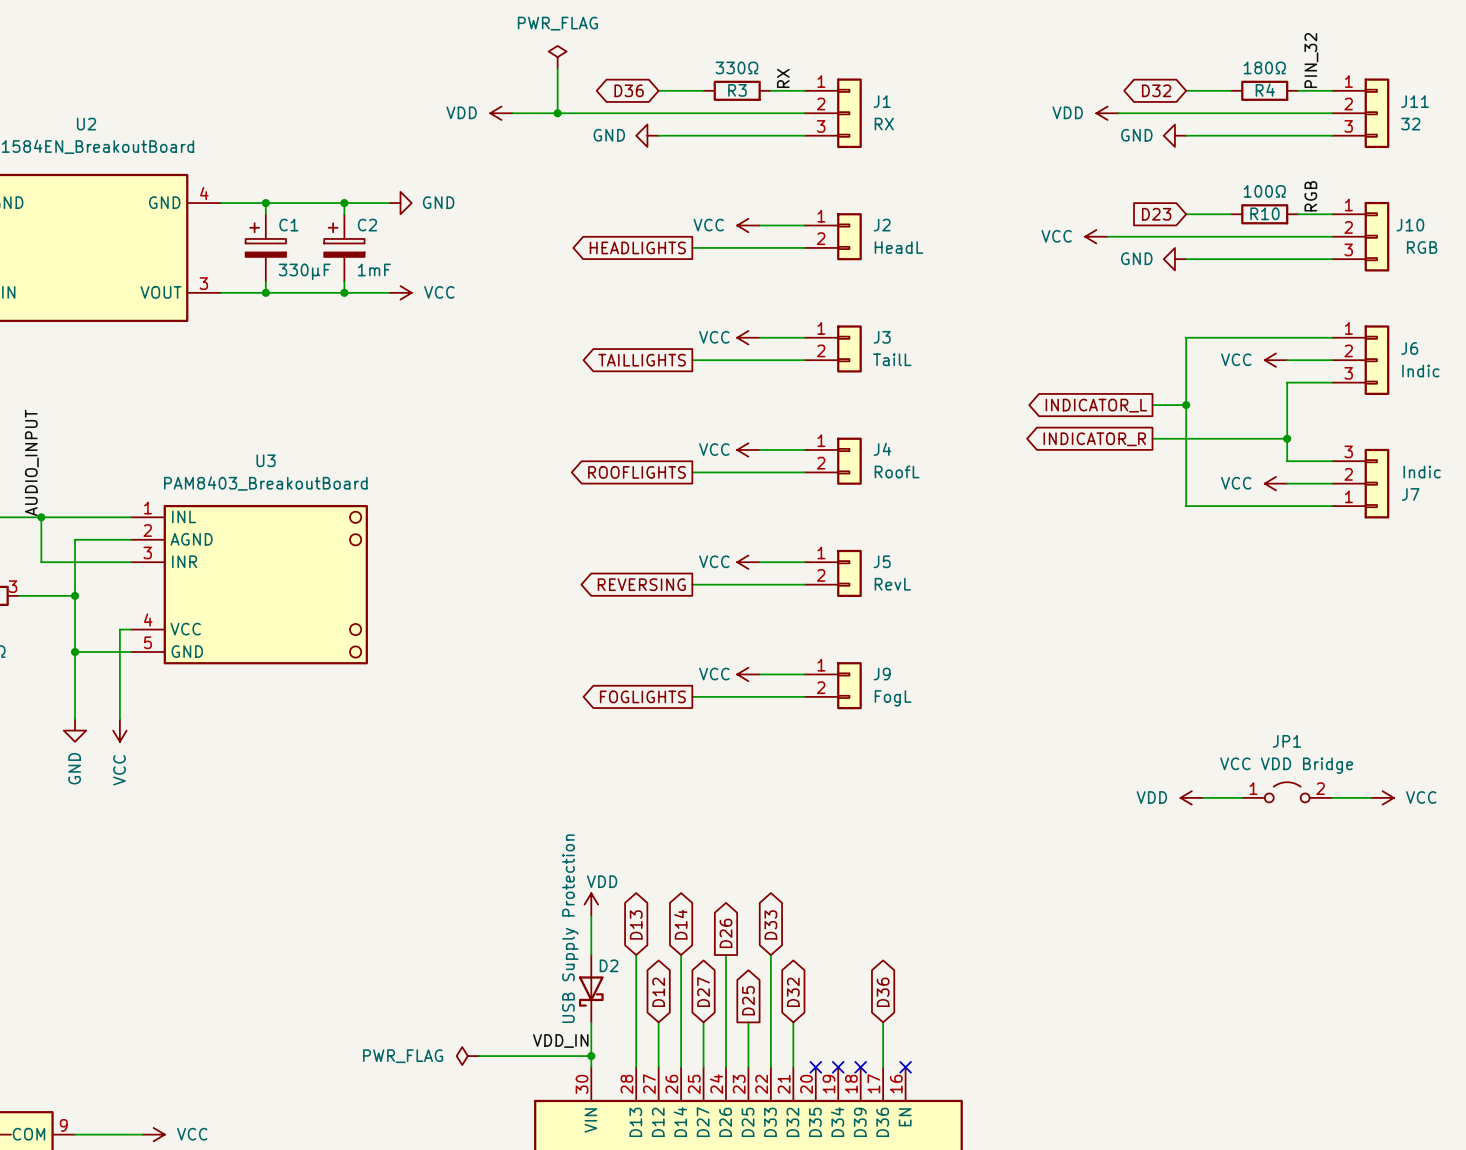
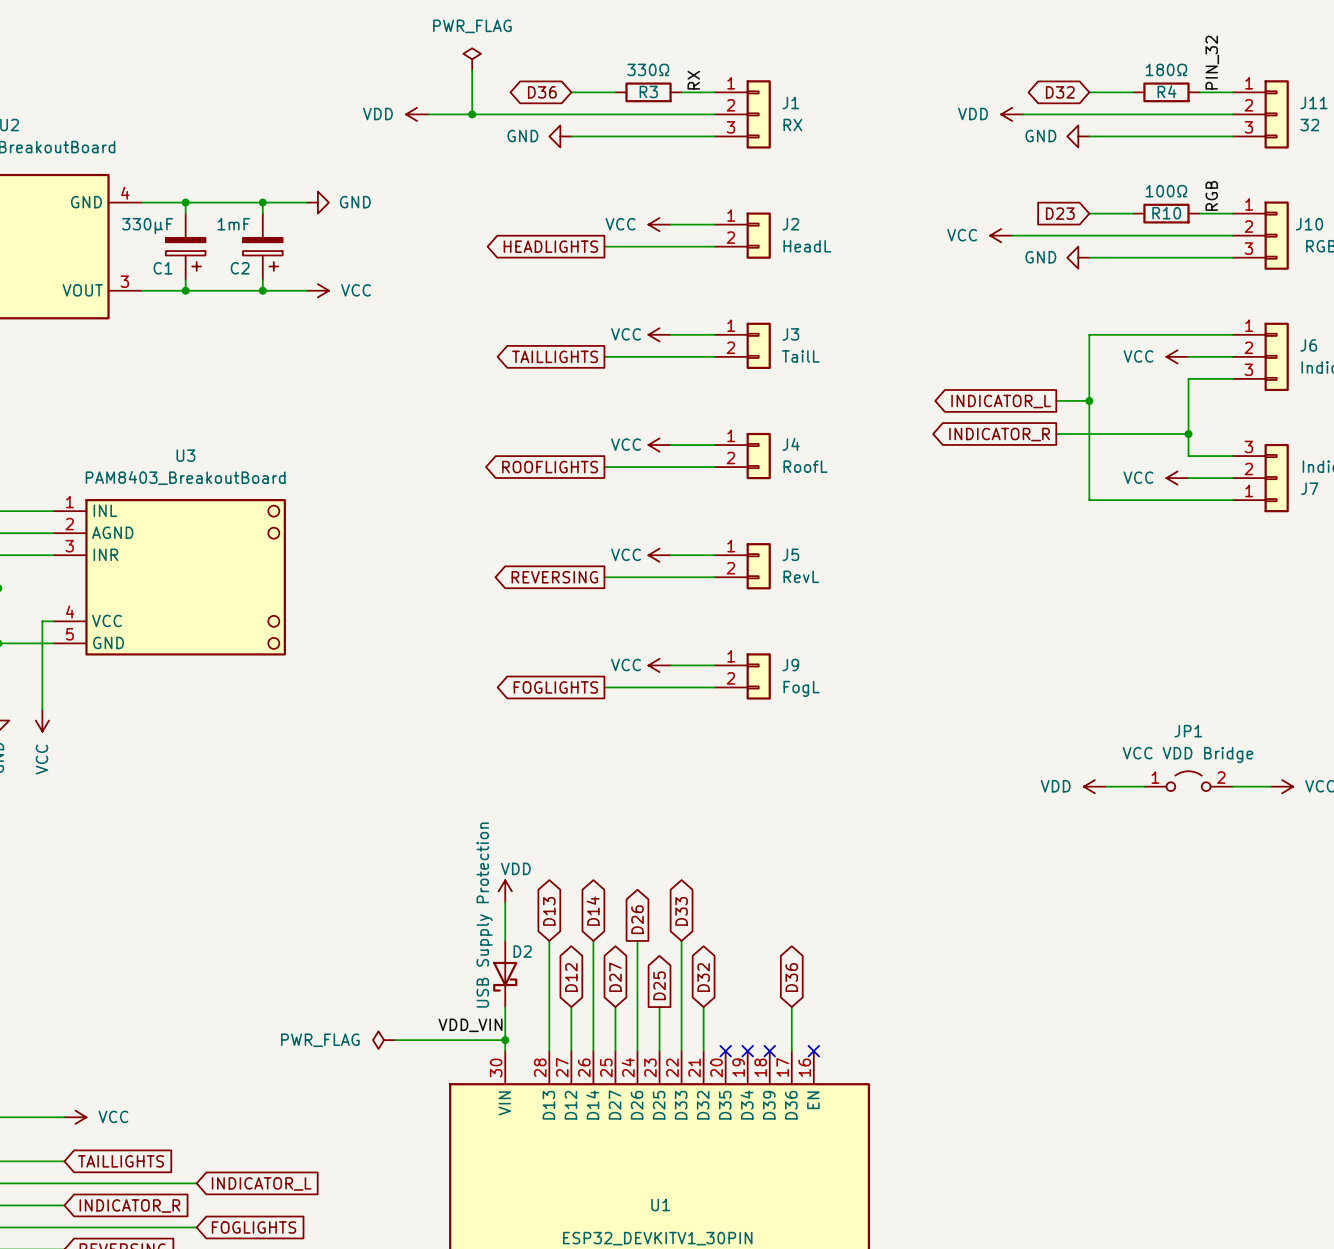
C1 rotation: 0° (265, 240) -> 180° (185, 254)
C2 rotation: 0° (344, 240) -> 180° (262, 254)
label: VDD_IN (560, 1040) -> VDD_VIN (470, 1025)

